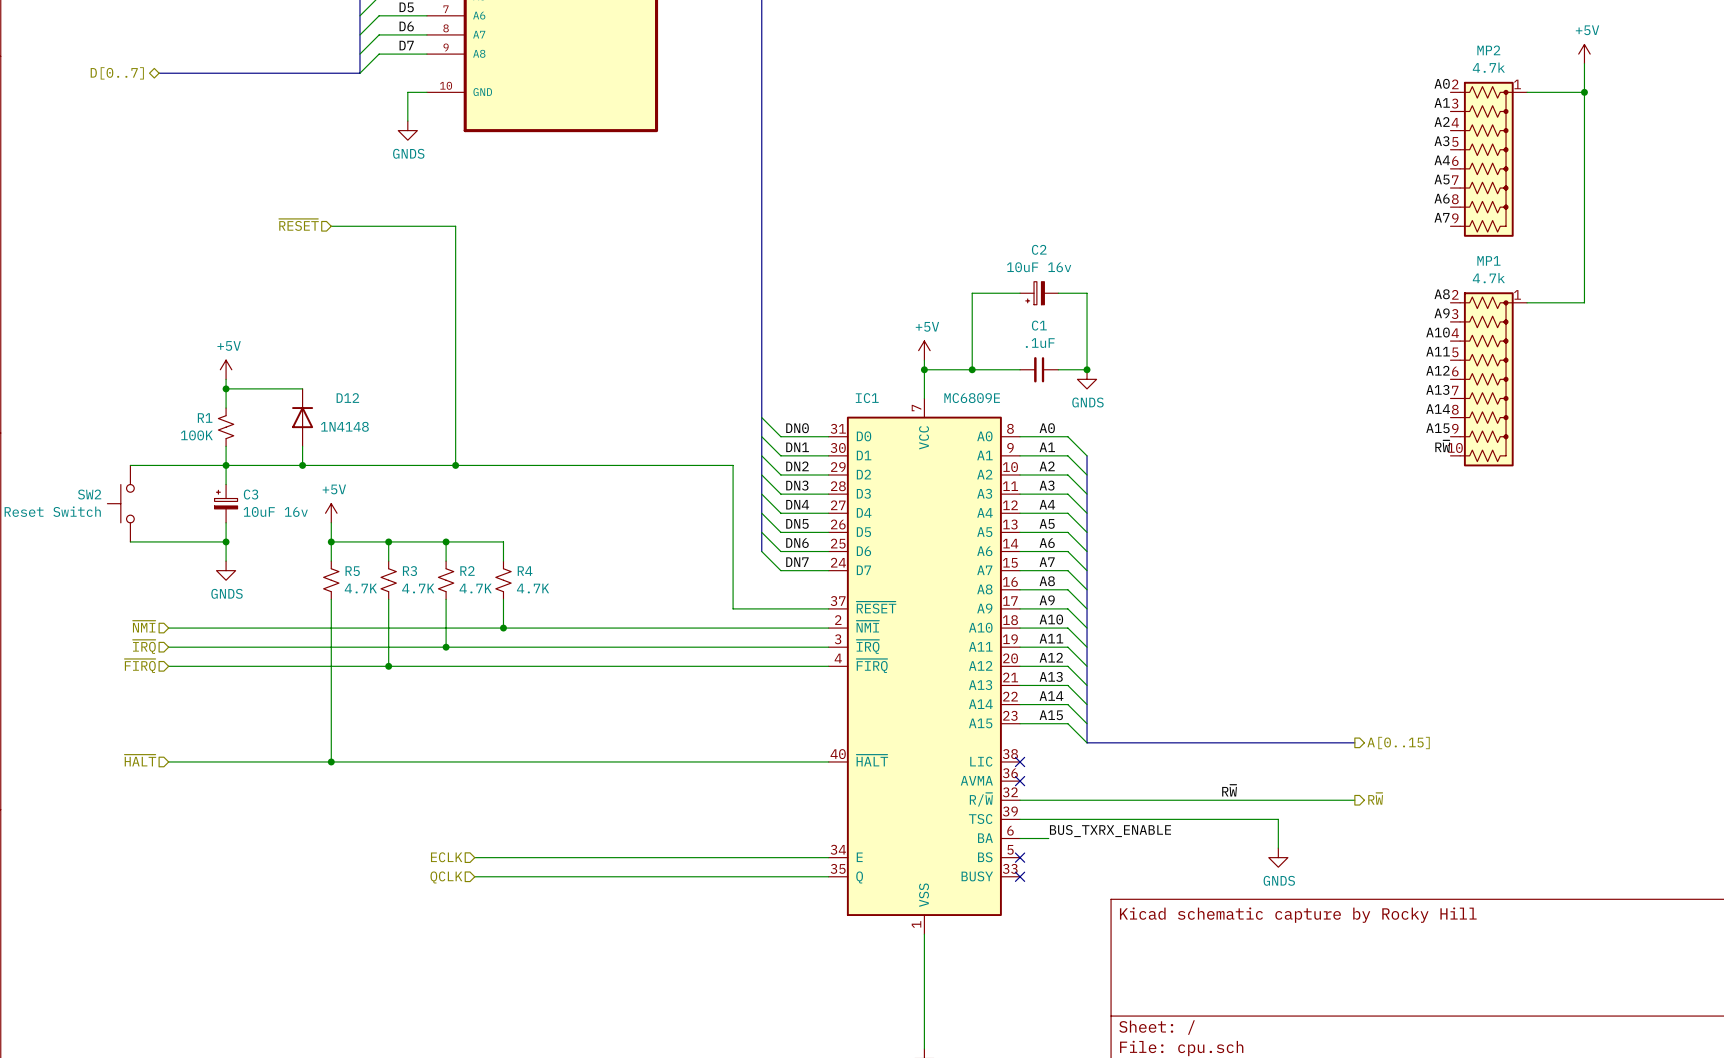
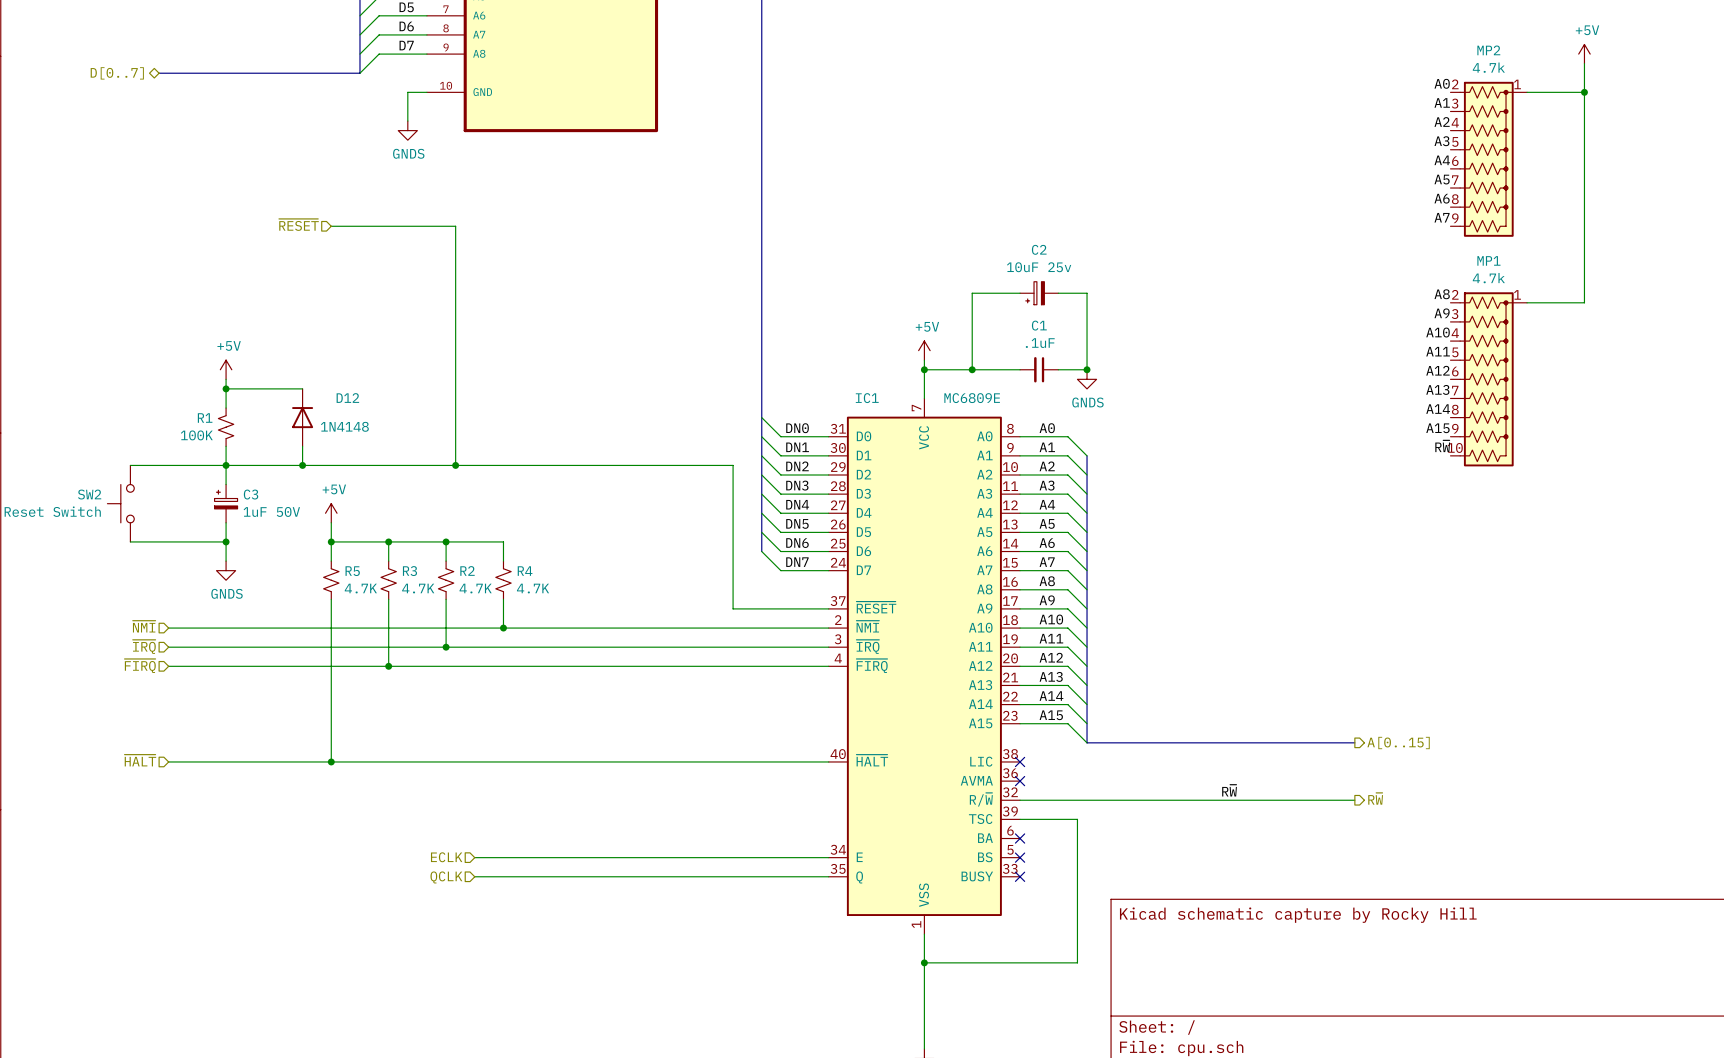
C2 value: 10uF 16v (1039, 267) -> 10uF 25v (1039, 267)
C3 value: 10uF 16v (275, 511) -> 1uF 50V (271, 511)
wire: (1077, 819) (1278, 819) (1278, 848) -> (1077, 819) (1077, 962) (924, 962)
label: BUS_TXRX_ENABLE (1110, 831) -> none
wire: (1020, 838) (1048, 838) -> none
no-connect mark: none -> (1020, 838)
power symbol: GNDS (1278, 857) -> none
junction: none -> (924, 962)

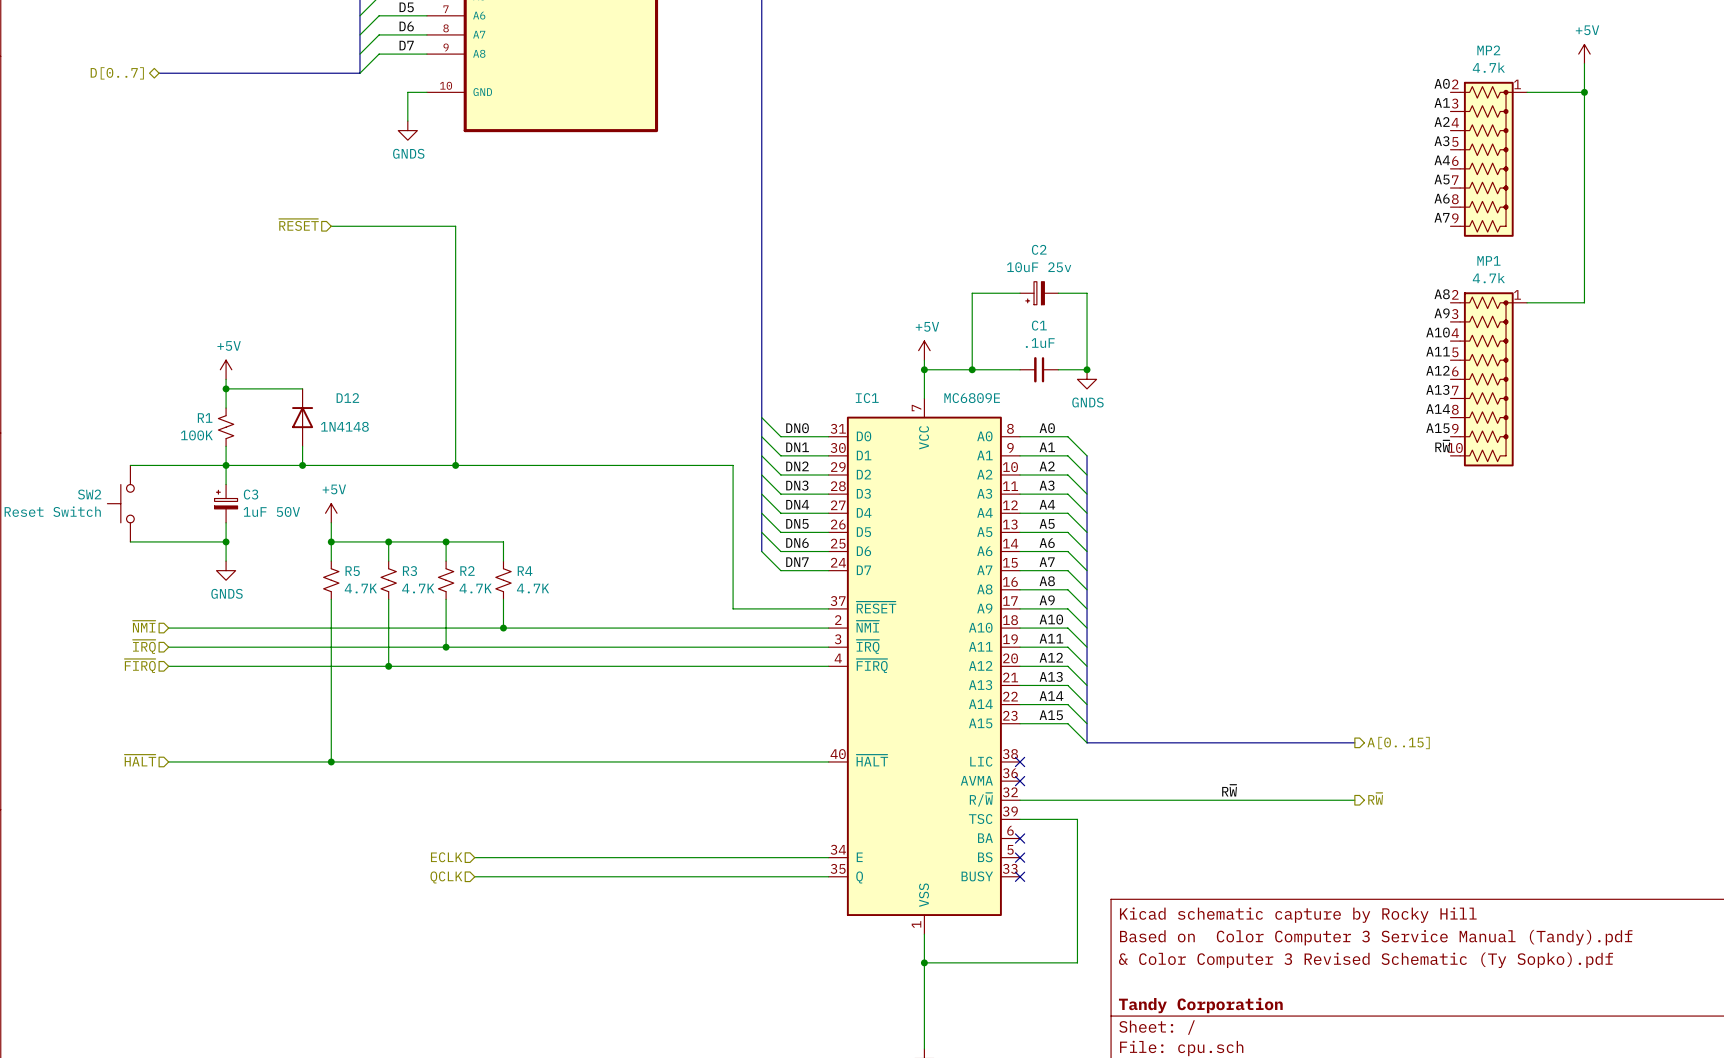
title block: none -> Based on Color Computer 3 Service Manual (Tandy).pdf (1376, 937)
title block: none -> & Color Computer 3 Revised Schematic (Ty Sopko).pdf (1366, 960)
title block: none -> Tandy Corporation (1200, 1005)

